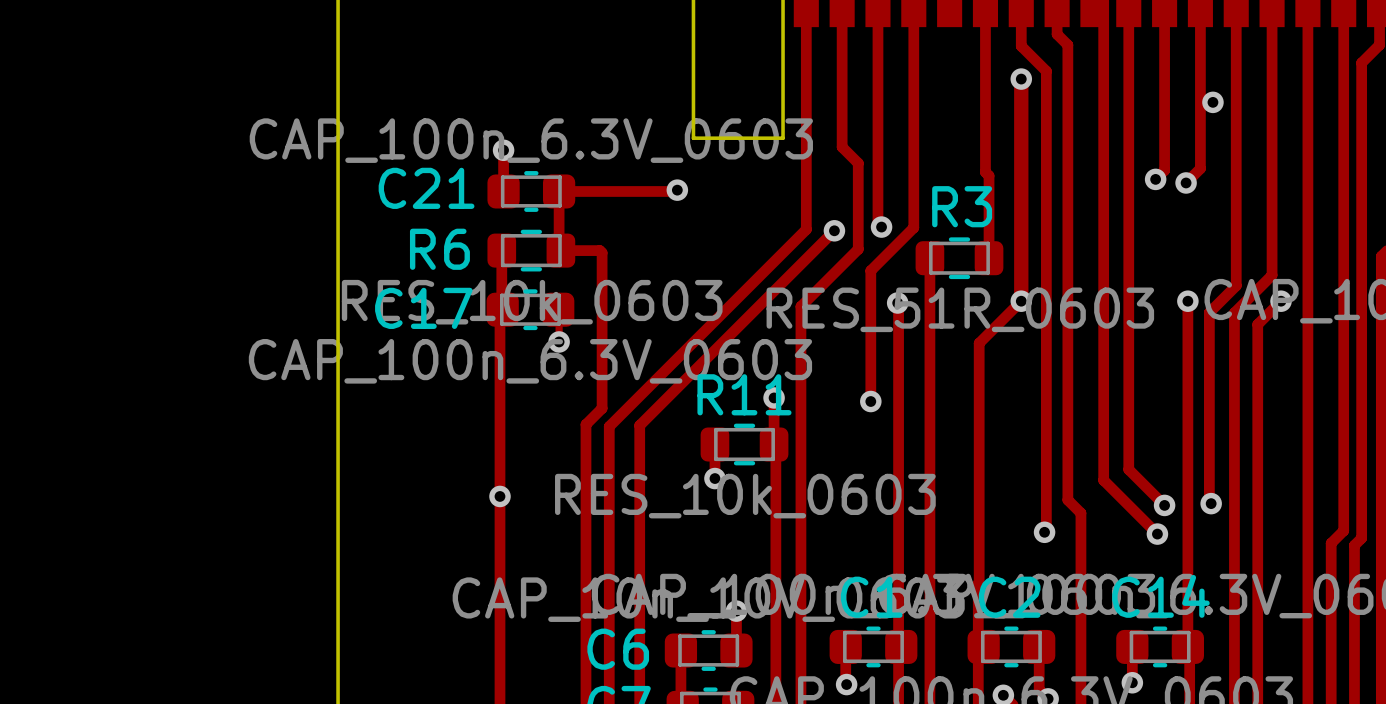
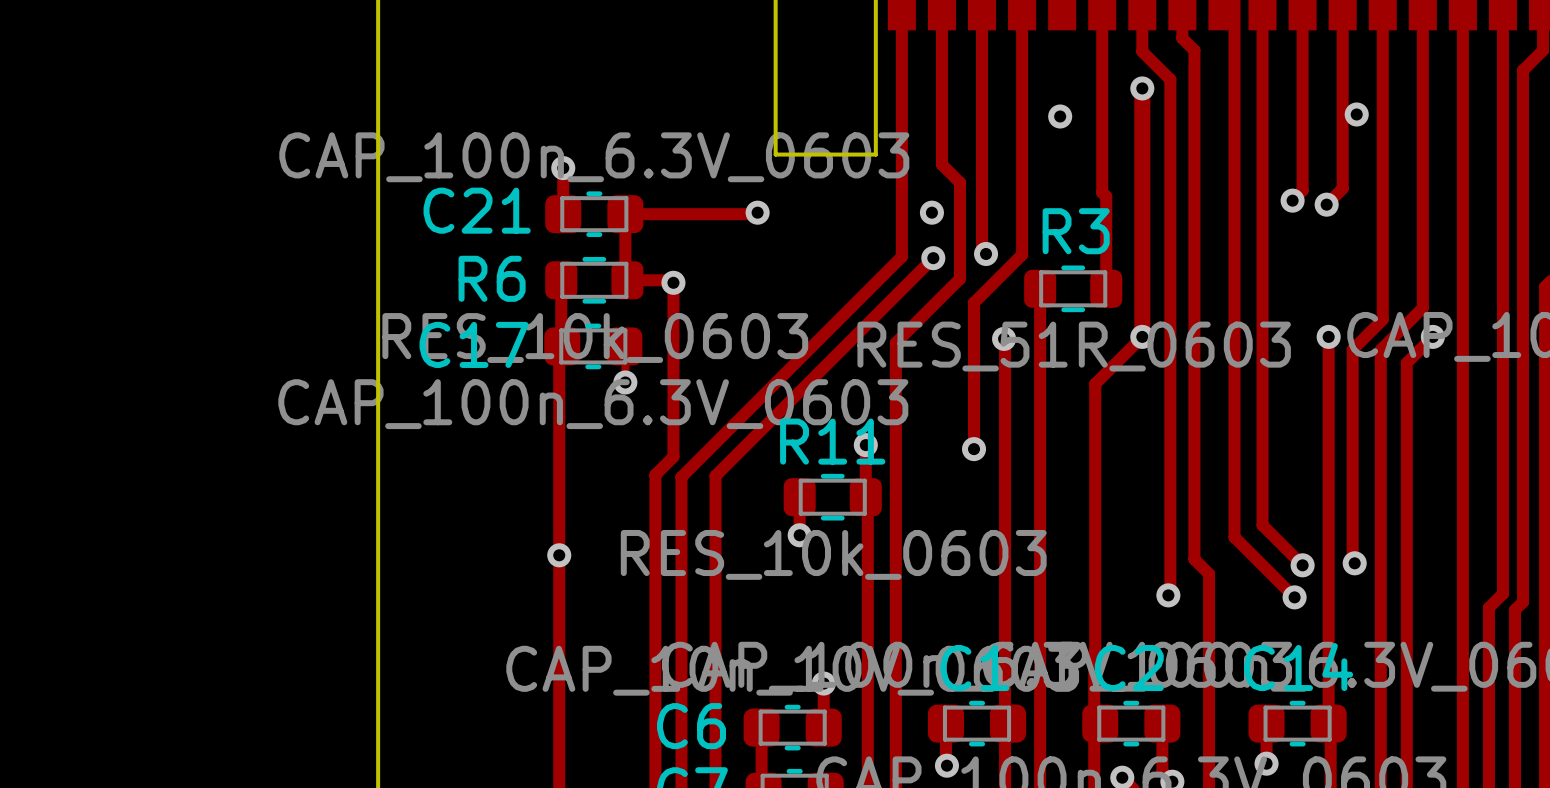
via: none -> (1060, 116)
via: none -> (931, 212)
via: none -> (673, 282)

